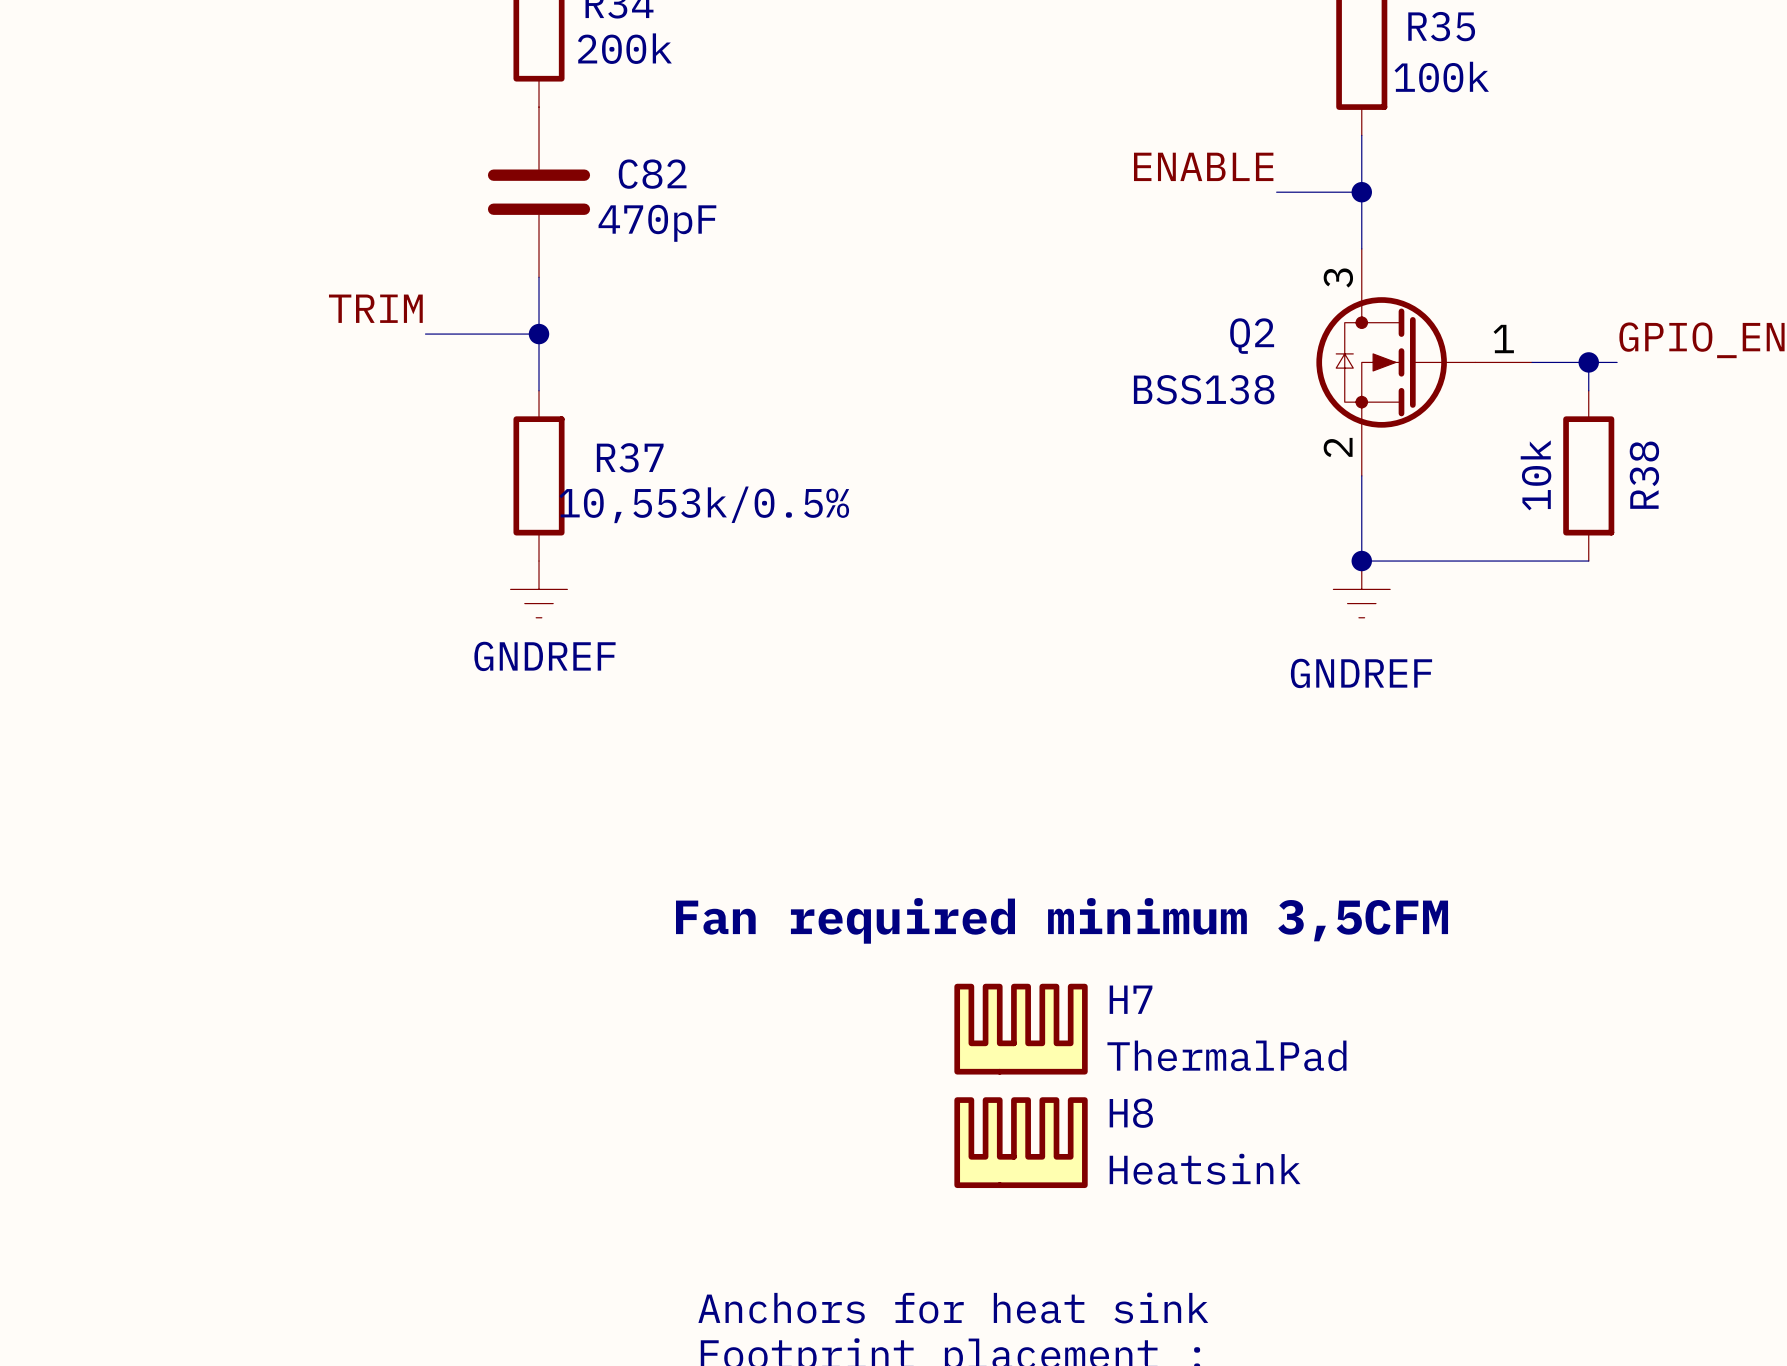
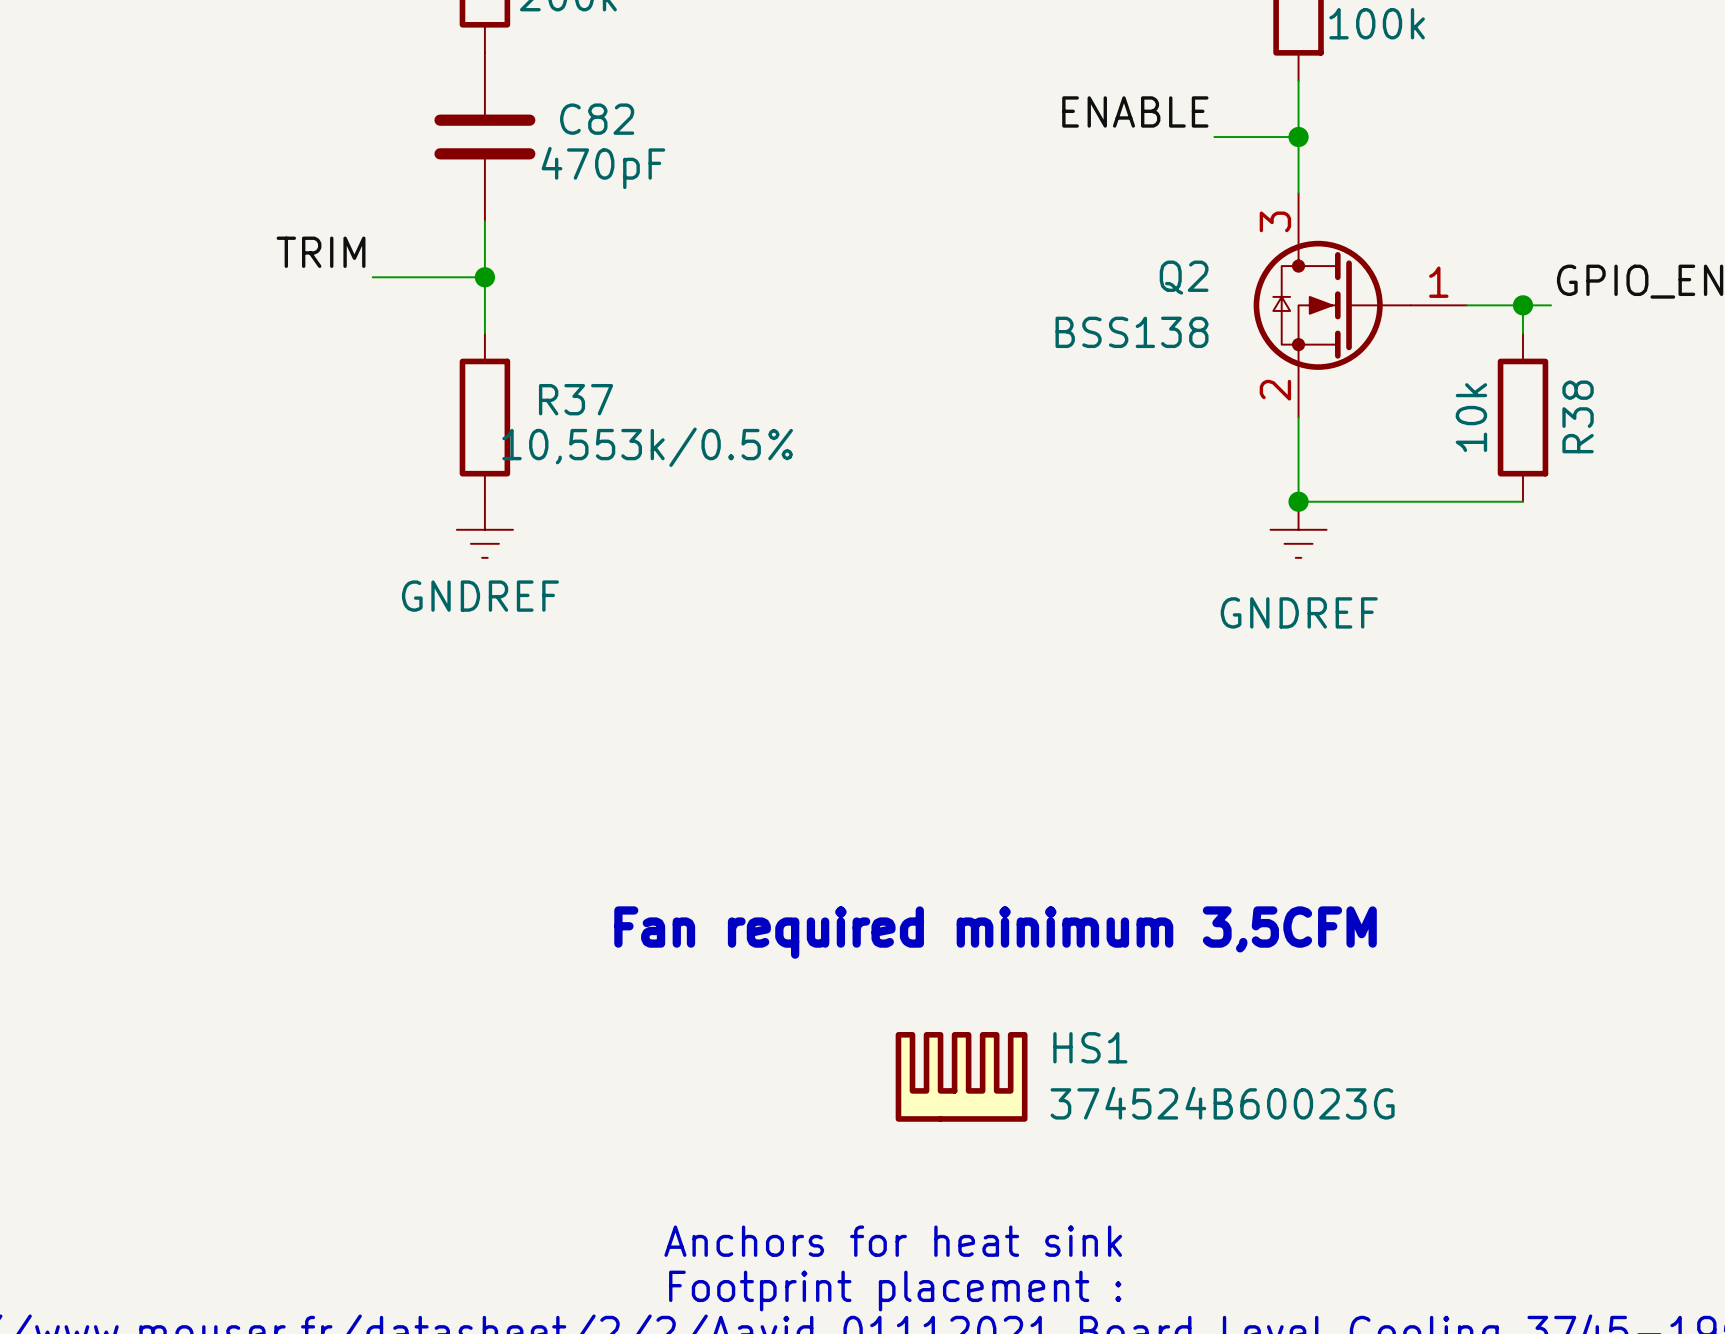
text position: Fan required minimum 3,5CFM (1062, 920) -> Fan required minimum 3,5CFM (995, 932)
H7: ThermalPad (1021, 1029) -> none
H8 name: H8 (1131, 1113) -> HS1 (1090, 1047)
H8 value: Heatsink (1205, 1169) -> 374524B60023G (1222, 1103)

